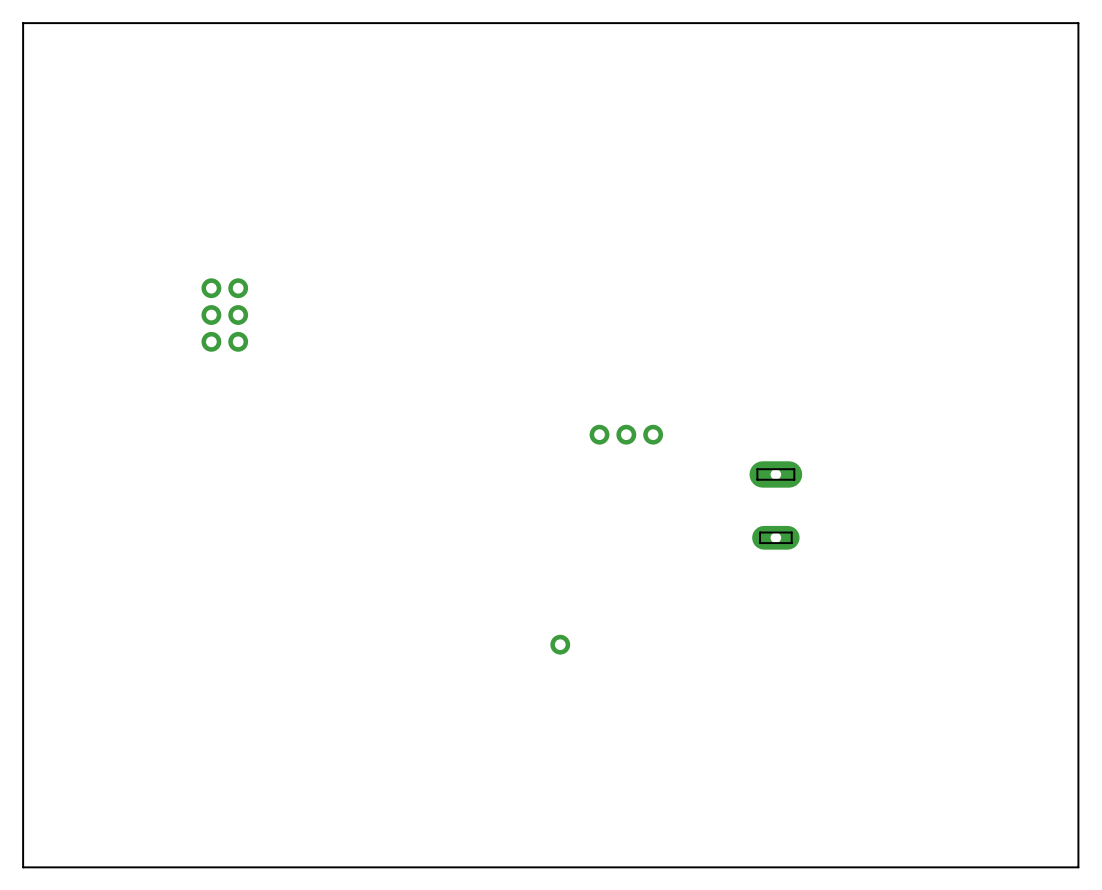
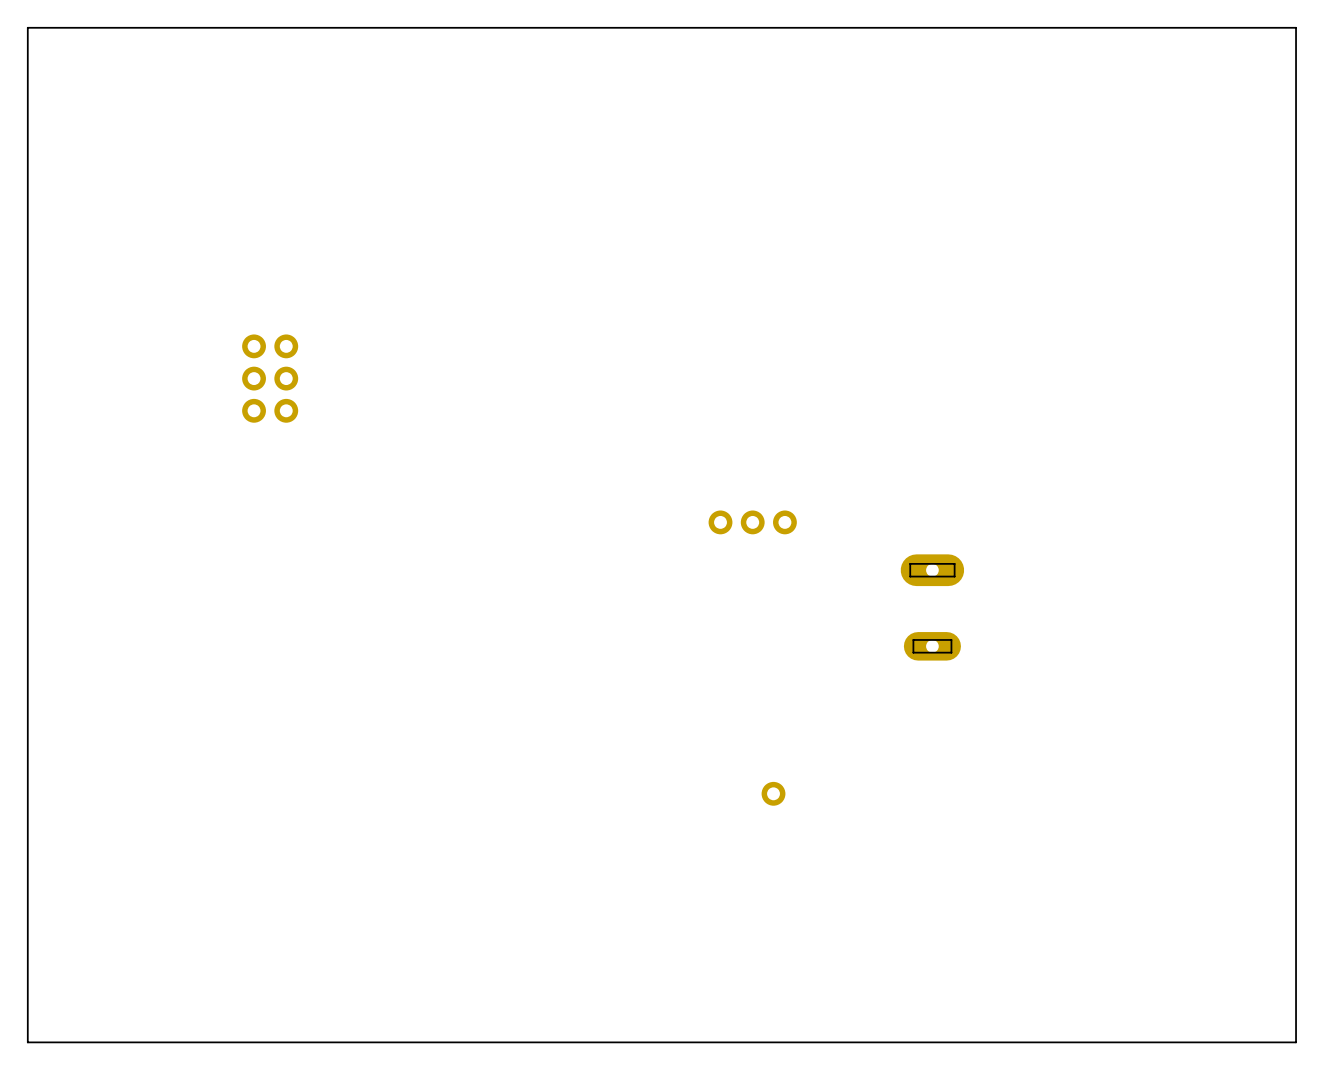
part position: (560, 644) -> (773, 793)

